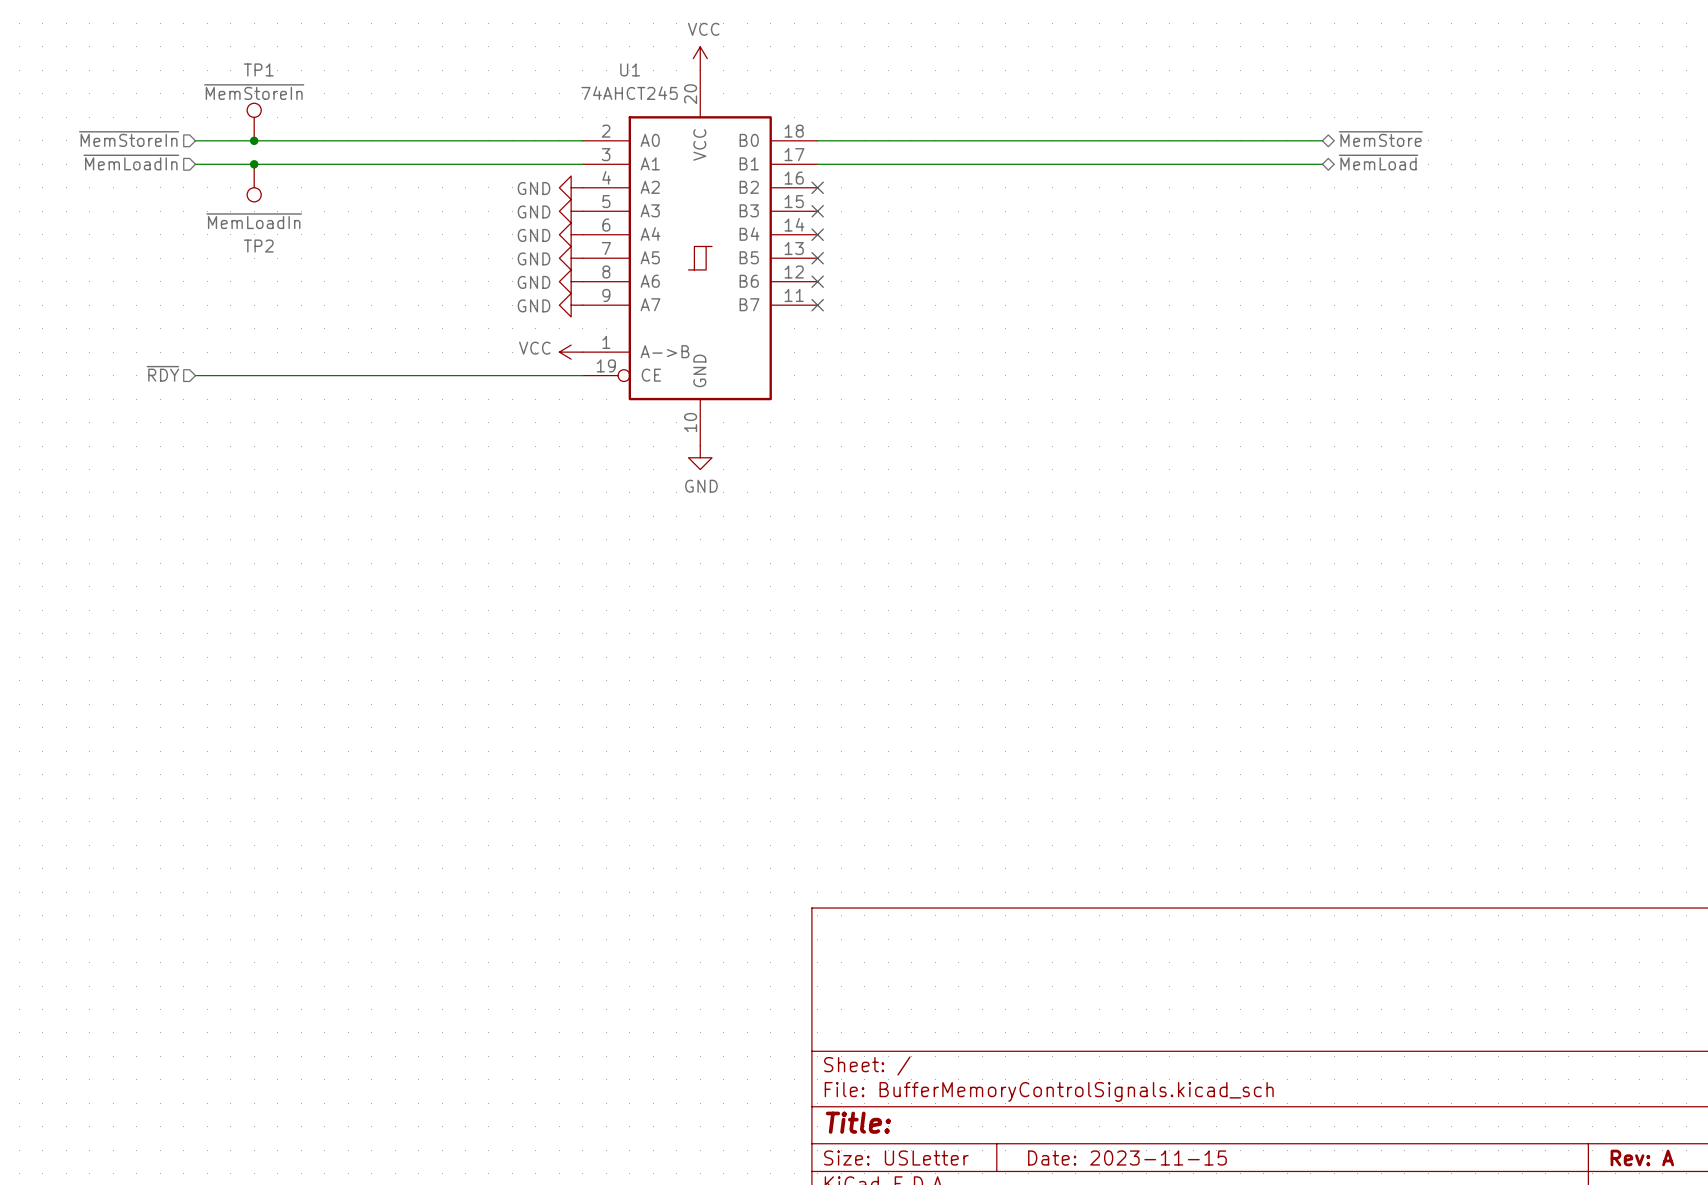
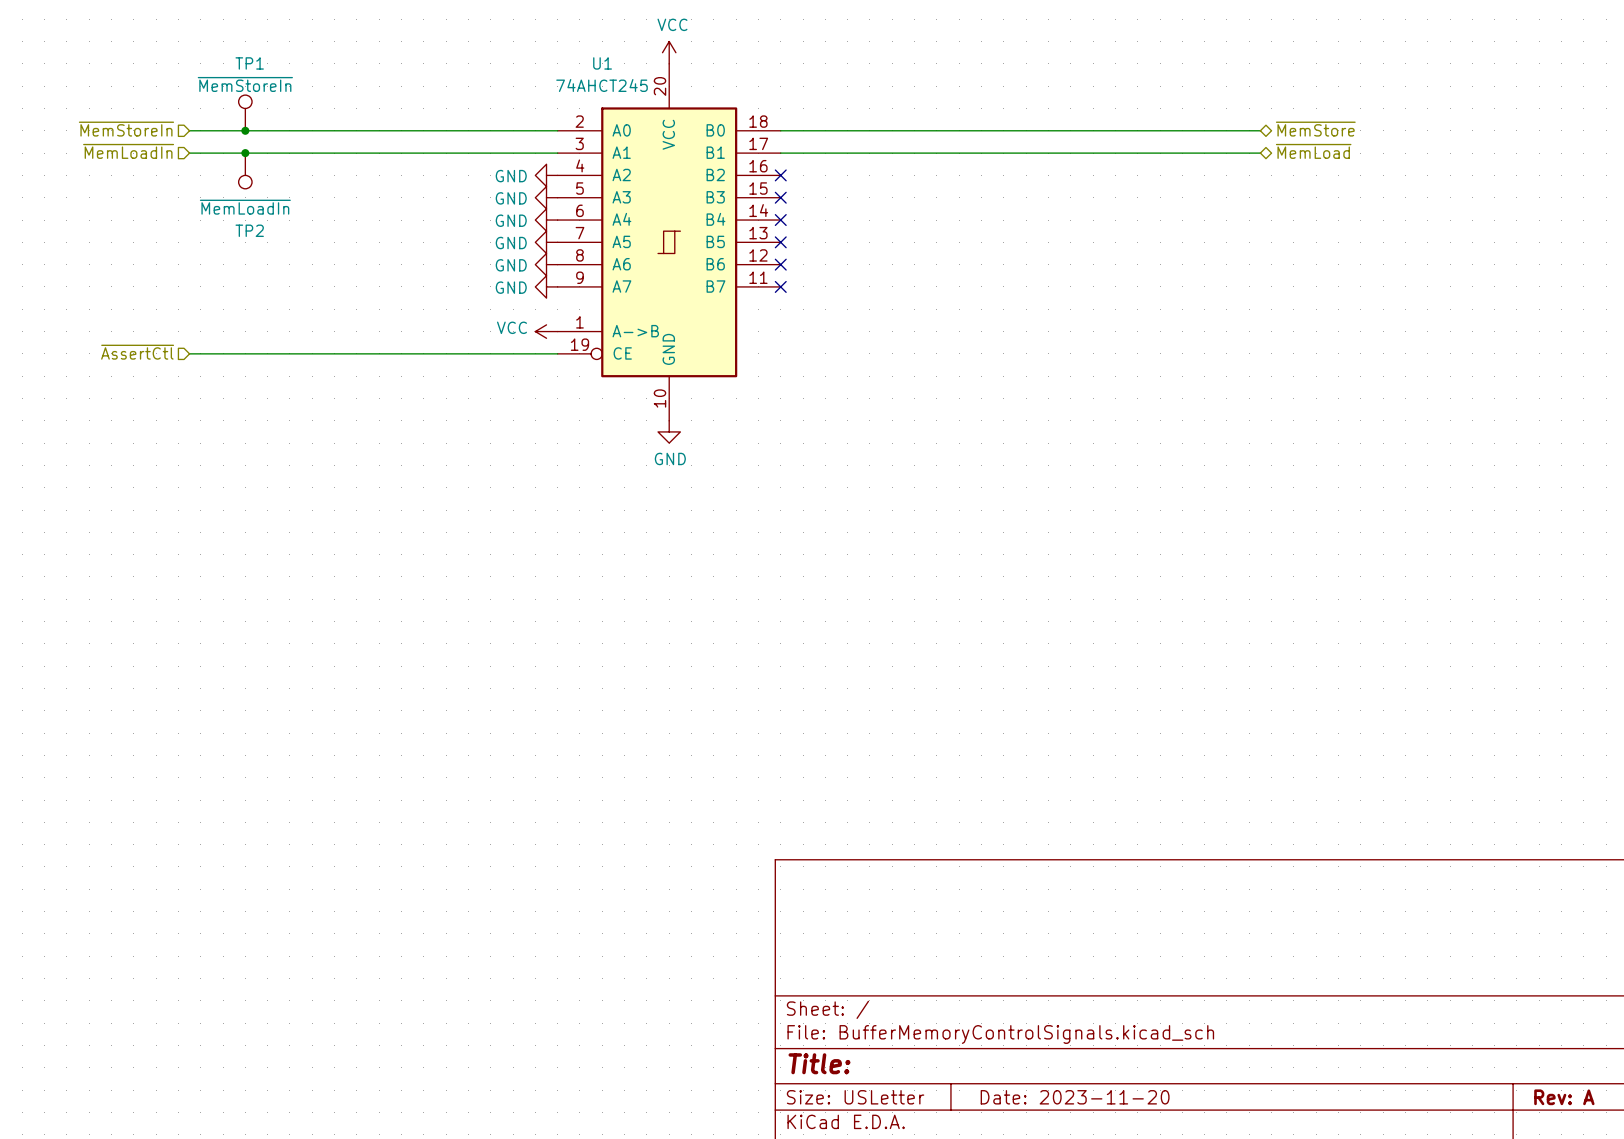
hierarchical label: ~{RDY} (162, 373) -> ~{AssertCtl} (137, 352)
title block: Date: 2023-11-15 (1127, 1158) -> Date: 2023-11-20 (1075, 1097)

